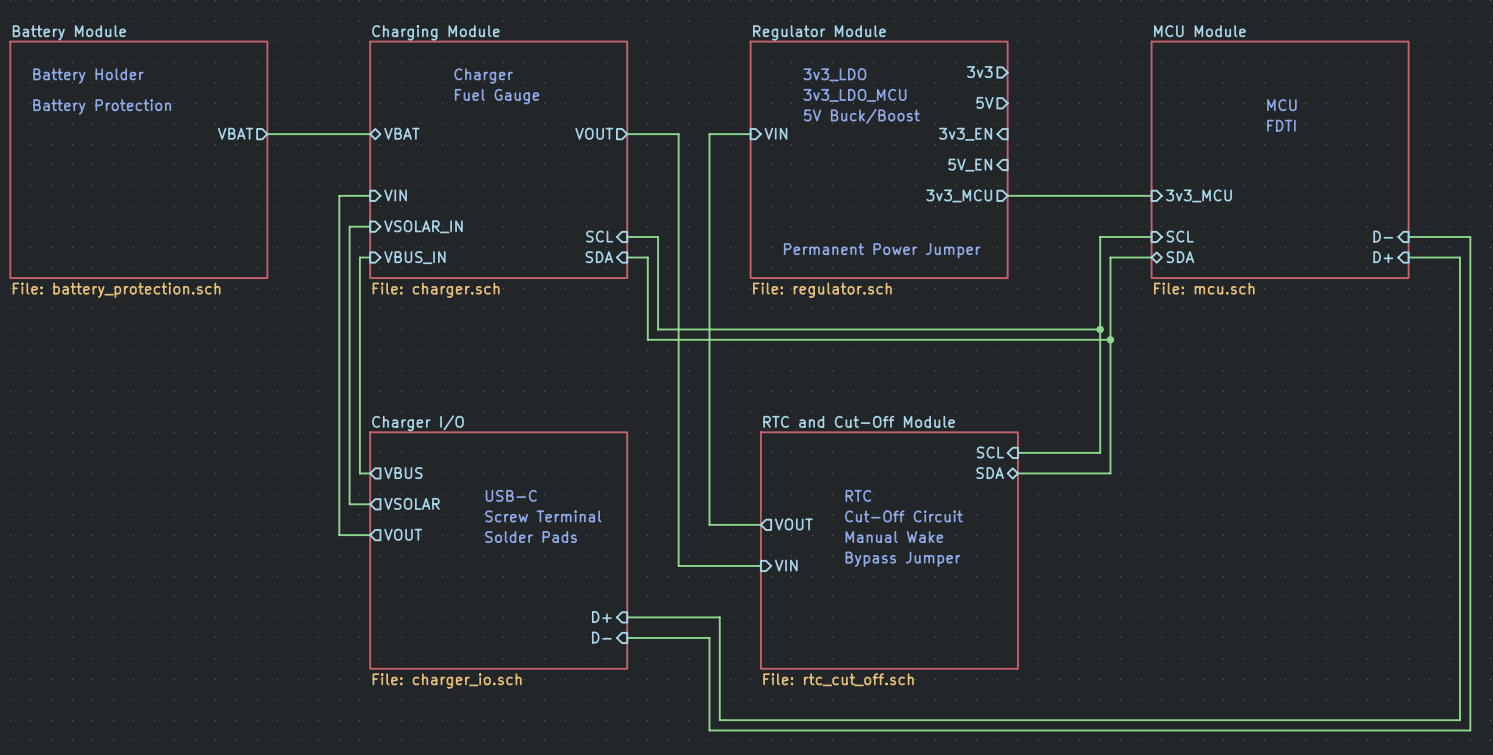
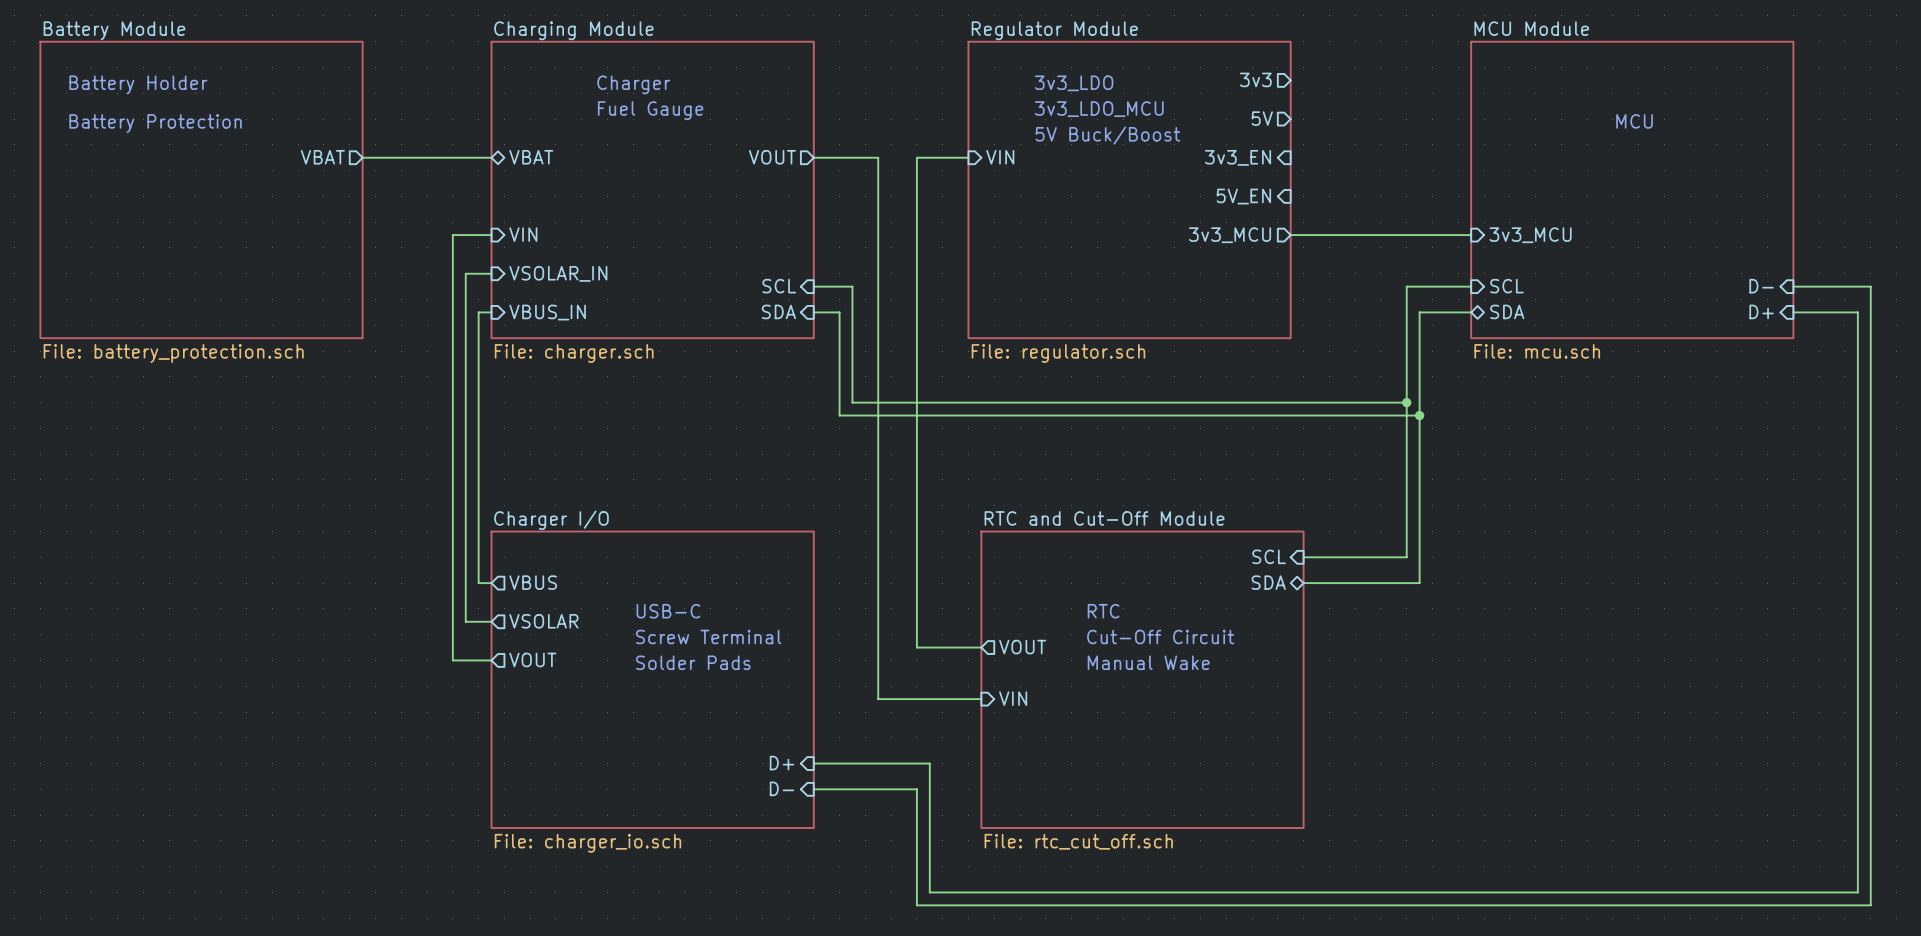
text: FDTI (1281, 125) -> none
text: Permanent Power Jumper (882, 250) -> none
text: Bypass Jumper (902, 559) -> none

